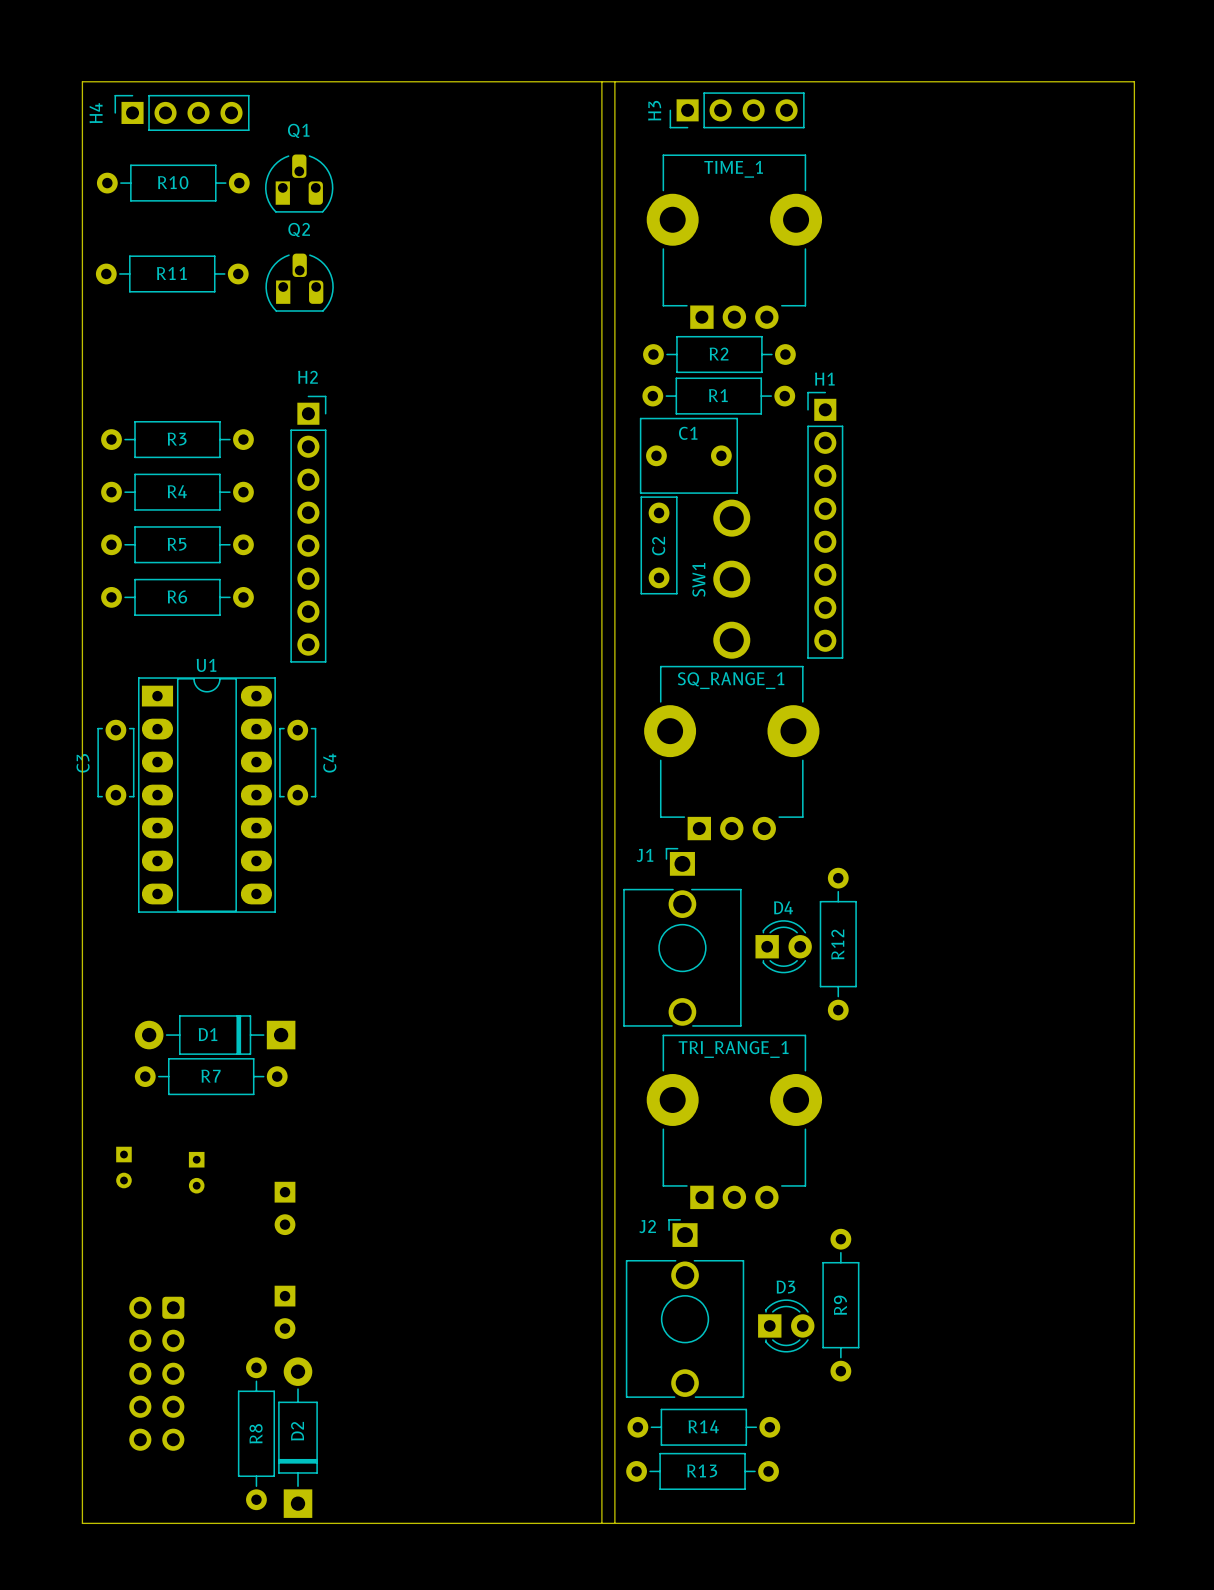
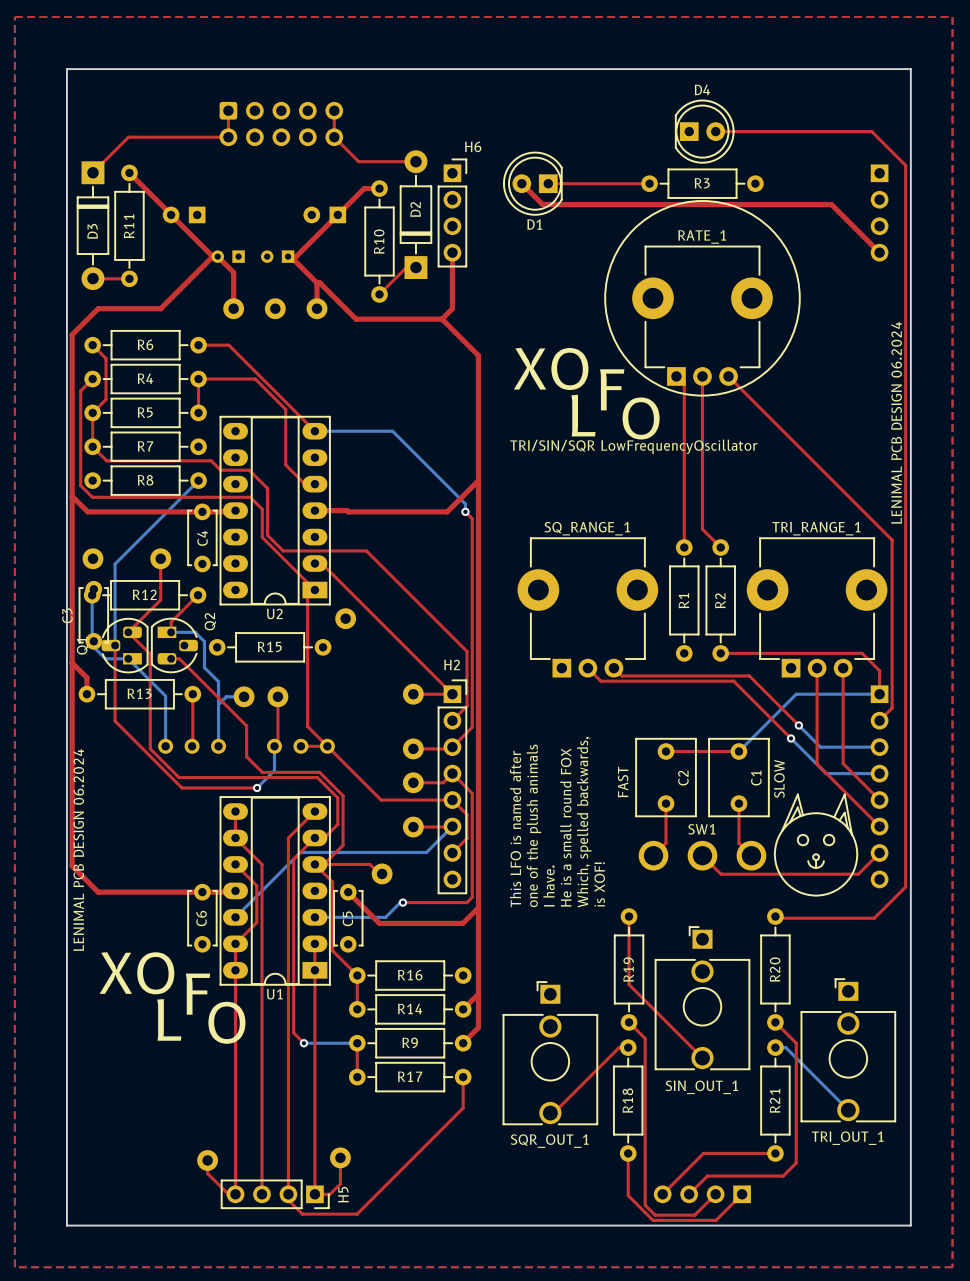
top zone outline: none -> (14, 16) (952, 16) (952, 1267) (14, 1267) (14, 16)
board edge: (601, 81) (601, 1523) -> none
board edge: (614, 81) (614, 1523) -> none
H3: (737, 110) -> none
H4: (182, 112) -> none
top track: none -> (228, 110) (228, 137) (128, 137) (92, 172)
top track: none -> (334, 110) (334, 137) (358, 161) (415, 161)
part: none -> (281, 123)
top track: none -> (715, 131) (871, 131) (905, 165) (905, 886) (874, 918) (777, 918) (775, 916)
R10 rotation: 0° (173, 183) -> 90° clockwise (379, 241)
R10 position: (173, 183) -> (379, 241)
Q1 rotation: 0° (299, 183) -> 90° counterclockwise (124, 645)
Q1 position: (299, 183) -> (124, 645)
top track: none -> (129, 172) (212, 256)
top track: none -> (521, 183) (542, 204) (831, 204) (879, 252)
top track: none -> (548, 183) (649, 183)
Q2 name position: Q2 (299, 229) -> Q2 (210, 621)
top track: none -> (379, 188) (364, 188) (296, 256) (288, 256)
TIME_1: (734, 241) -> none
drawing: none -> [604, 200, 801, 397]
H6: none -> (452, 212)
part: none -> (879, 212)
part: none -> (184, 214)
part: none -> (324, 214)
R11 rotation: 0° (172, 273) -> 90° clockwise (129, 225)
Q2 rotation: 0° (299, 282) -> 90° clockwise (174, 645)
Q2 position: (299, 282) -> (174, 645)
top track: none -> (452, 252) (452, 308) (442, 319)
top track: none -> (212, 256) (217, 256) (233, 272) (233, 308)
top track: none -> (212, 256) (160, 308) (98, 308) (72, 334) (72, 866) (98, 892) (235, 890)
part: none -> (228, 256)
part: none -> (277, 256)
top track: none -> (290, 256) (317, 282)
top track: none -> (415, 267) (406, 267) (379, 294)
top track: none -> (92, 278) (129, 278)
top track: none -> (317, 282) (317, 308)
top track: none -> (317, 282) (319, 282) (356, 319) (442, 319)
R2 rotation: 0° (719, 354) -> 90° clockwise (720, 600)
R2 position: (719, 354) -> (720, 600)
part: none -> (233, 308)
part: none -> (275, 308)
part: none -> (317, 308)
RATE_1: none -> (702, 315)
top track: none -> (442, 319) (478, 355) (478, 1027) (463, 1043)
R1 rotation: 0° (718, 396) -> 90° clockwise (684, 600)
R1 position: (718, 396) -> (684, 600)
top track: none -> (92, 345) (106, 358) (106, 399) (92, 412) (92, 446) (106, 460) (211, 460) (220, 470) (249, 470) (267, 488) (267, 535) (283, 550) (366, 550) (467, 651) (467, 706) (452, 720)
top track: none -> (198, 345) (228, 345) (314, 431)
R3 position: (177, 439) -> (702, 183)
text: none -> XO (551, 368)
C1 rotation: 0° (688, 455) -> 90° clockwise (738, 777)
C1 position: (688, 455) -> (738, 777)
top track: none -> (676, 376) (684, 384) (684, 547)
top track: none -> (702, 376) (702, 529) (720, 547)
top track: none -> (728, 376) (892, 540) (892, 708) (879, 720)
top track: none -> (92, 379) (80, 391) (80, 485) (92, 497) (250, 497) (262, 509) (262, 537) (314, 590) (307, 597) (307, 726) (381, 800) (452, 800) (467, 814) (467, 838) (452, 852)
text: none -> F (612, 389)
R4 position: (177, 492) -> (145, 379)
C2 footprint: [640, 496, 678, 595] -> [635, 738, 697, 817]
top track: none -> (198, 412) (198, 379) (255, 379) (285, 409) (285, 465) (304, 484) (314, 484)
text: none -> L (583, 415)
text: none -> O (641, 418)
text: none -> LENIMAL PCB DESIGN 06.2024 (896, 422)
H1: (825, 525) -> none
H2 position: (308, 529) -> (452, 786)
bottom track: none -> (314, 431) (392, 431) (465, 504) (465, 511)
R5 position: (177, 544) -> (145, 412)
text: none -> TRI/SIN/SQR LowFrequencyOscillator (633, 446)
SW1 rotation: 0° (731, 579) -> 90° clockwise (702, 855)
SW1 position: (731, 579) -> (702, 855)
bottom track: none -> (198, 480) (115, 564) (115, 645)
top track: none -> (478, 480) (447, 511) (314, 510)
R6 position: (177, 597) -> (145, 345)
top track: none -> (72, 496) (87, 511) (235, 510)
U2: none -> (275, 510)
top track: none -> (465, 511) (472, 518) (472, 727) (450, 748) (413, 748)
via: none -> (465, 511)
SQ_RANGE_1 name position: SQ_RANGE_1 (731, 680) -> SQ_RANGE_1 (587, 528)
part: none -> (92, 558)
top track: none -> (160, 558) (160, 599) (128, 632) (150, 654) (150, 748) (178, 777) (317, 777) (337, 797) (337, 824) (324, 837) (314, 837) (293, 859) (293, 1032) (303, 1043)
part: none -> (160, 558)
top track: none -> (314, 563) (321, 563) (452, 694) (413, 694)
bottom track: none -> (92, 595) (92, 645) (105, 658) (128, 658) (165, 696) (165, 746)
top track: none -> (198, 595) (171, 622) (171, 632)
C4 position: (297, 762) -> (202, 537)
C4 name position: C4 (329, 763) -> C4 (202, 538)
part: none -> (345, 618)
bottom track: none -> (171, 632) (195, 632) (204, 641) (204, 667) (218, 681) (218, 746)
U1 rotation: 0° (206, 795) -> 180° (275, 890)
U1 position: (206, 795) -> (275, 890)
top track: none -> (115, 645) (115, 721) (182, 787) (257, 787)
R15: none -> (270, 647)
top track: none -> (720, 653) (862, 653) (879, 670) (879, 694)
top track: none -> (171, 658) (179, 658) (246, 725) (246, 756) (262, 772) (319, 772) (343, 795) (343, 845) (323, 864)
top track: none -> (72, 662) (86, 677) (86, 694)
top track: none -> (587, 668) (600, 681) (733, 681) (791, 738)
top track: none -> (613, 668) (621, 675) (749, 675) (798, 725)
top track: none -> (817, 668) (817, 764) (879, 826)
top track: none -> (843, 668) (843, 763) (879, 800)
top track: none -> (192, 694) (192, 746)
part: none -> (413, 694)
bottom track: none -> (879, 694) (796, 694) (738, 751)
bottom track: none -> (244, 696) (226, 696) (218, 704)
part: none -> (244, 696)
top track: none -> (277, 696) (277, 742) (274, 746)
part: none -> (277, 696)
bottom track: none -> (798, 725) (820, 747) (879, 747)
via: none -> (798, 725)
bottom track: none -> (791, 738) (826, 773) (879, 773)
via: none -> (791, 738)
D4 footprint: [755, 920, 812, 974] -> [675, 99, 735, 164]
part: none -> (192, 746)
bottom track: none -> (274, 746) (274, 770) (257, 787)
top track: none -> (300, 746) (327, 746)
part: none -> (300, 746)
part: none -> (413, 748)
top track: none -> (666, 751) (738, 751)
J1: (682, 937) -> none
R12 rotation: 0° (838, 944) -> 90° clockwise (145, 595)
R12 position: (838, 944) -> (145, 595)
text: none -> SLOW (779, 778)
text: none -> FAST (623, 782)
top track: none -> (413, 782) (443, 782) (452, 773) (472, 793) (472, 897) (467, 902) (402, 902)
part: none -> (413, 782)
part: none -> (879, 786)
via: none -> (257, 787)
top track: none -> (666, 803) (666, 843) (653, 855)
top track: none -> (738, 803) (738, 843) (751, 855)
top track: none -> (235, 811) (235, 837) (261, 864) (261, 1194)
top track: none -> (314, 811) (288, 837) (288, 1200) (302, 1214) (357, 1214) (463, 1108) (463, 1077)
drawing: none -> [774, 812, 859, 897]
line: none -> (800, 815) (797, 807) (790, 822)
line: none -> (803, 815) (797, 794) (782, 830)
line: none -> (834, 817) (844, 794) (852, 834)
D1 footprint: [134, 1015, 296, 1055] -> [503, 151, 563, 216]
line: none -> (839, 820) (844, 812) (847, 828)
text: none -> Which, spelled backwards, (584, 822)
top track: none -> (452, 826) (413, 827)
bottom track: none -> (452, 826) (426, 852) (300, 852) (235, 917)
text: none -> one of the plush animals (533, 825)
part: none -> (413, 827)
text: none -> He is a small round FOX (565, 827)
text: none -> This LFO is named after (515, 829)
D1 name position: D1 (208, 1034) -> D1 (534, 224)
TRI_RANGE_1 name position: TRI_RANGE_1 (733, 1049) -> TRI_RANGE_1 (816, 528)
text: none -> LENIMAL PCB DESIGN 06.2024 (78, 850)
top track: none -> (879, 852) (858, 874) (720, 874) (702, 855)
line: none -> (816, 860) (816, 867)
line: none -> (808, 861) (810, 866) (816, 867) (821, 866) (823, 861)
top track: none -> (235, 864) (256, 885) (256, 922) (235, 943) (235, 1194) (228, 1194) (207, 1173) (207, 1160)
R7 position: (211, 1076) -> (145, 446)
top track: none -> (382, 873) (379, 873) (370, 864) (314, 864) (332, 882) (332, 950) (357, 975) (357, 1009)
part: none -> (382, 873)
text: none -> is XOF! (599, 884)
text: none -> I have. (549, 886)
top track: none -> (348, 892) (379, 923) (462, 923) (478, 907)
bottom track: none -> (402, 902) (400, 902) (385, 917) (314, 917)
via: none -> (402, 902)
TRI_RANGE_1 position: (734, 1121) -> (817, 607)
top track: none -> (629, 916) (629, 984) (702, 1058)
C6: none -> (202, 918)
C5: none -> (348, 918)
part: (123, 1167) -> none
part: (196, 1172) -> none
top track: none -> (314, 943) (314, 1194) (330, 1194) (340, 1183) (340, 1157)
R19: none -> (629, 969)
R20: none -> (775, 969)
text: none -> XO (136, 973)
part: (285, 1208) -> none
R16: none -> (410, 975)
J2 name: J2 (647, 1226) -> SQR_OUT_1 (549, 1141)
text: none -> F (198, 994)
top track: none -> (478, 994) (463, 1009)
SIN_OUT_1: none -> (702, 998)
text: none -> L (169, 1019)
text: none -> O (226, 1022)
top track: none -> (629, 1022) (645, 1038) (645, 1205) (655, 1215) (694, 1215) (715, 1194)
top track: none -> (775, 1022) (796, 1043) (796, 1163) (783, 1176) (707, 1176) (689, 1194)
D3 name position: D3 (785, 1287) -> D3 (92, 231)
bottom track: none -> (303, 1043) (357, 1043)
via: none -> (303, 1043)
top track: none -> (357, 1043) (357, 1077)
D3 footprint: [758, 1299, 815, 1353] -> [77, 161, 109, 291]
top track: none -> (628, 1047) (619, 1047) (556, 1110)
bottom track: none -> (775, 1047) (785, 1047) (848, 1110)
TRI_OUT_1: none -> (848, 1050)
R9 rotation: 0° (840, 1305) -> 90° clockwise (410, 1043)
R9 position: (840, 1305) -> (410, 1043)
part: (285, 1312) -> none
R17: none -> (410, 1077)
R18: none -> (628, 1100)
R21: none -> (775, 1100)
part: (156, 1373) -> none
R14 position: (703, 1427) -> (410, 1009)
R8 rotation: 0° (256, 1433) -> 90° clockwise (145, 480)
R8 position: (256, 1433) -> (145, 480)
top track: none -> (628, 1153) (628, 1195) (653, 1220) (716, 1220) (742, 1194)
top track: none -> (775, 1153) (703, 1153) (662, 1194)
D2 position: (298, 1437) -> (415, 214)
part: none -> (340, 1157)
part: none -> (207, 1160)
R13 position: (702, 1471) -> (139, 694)
H5: none -> (275, 1194)
part: none -> (702, 1194)

